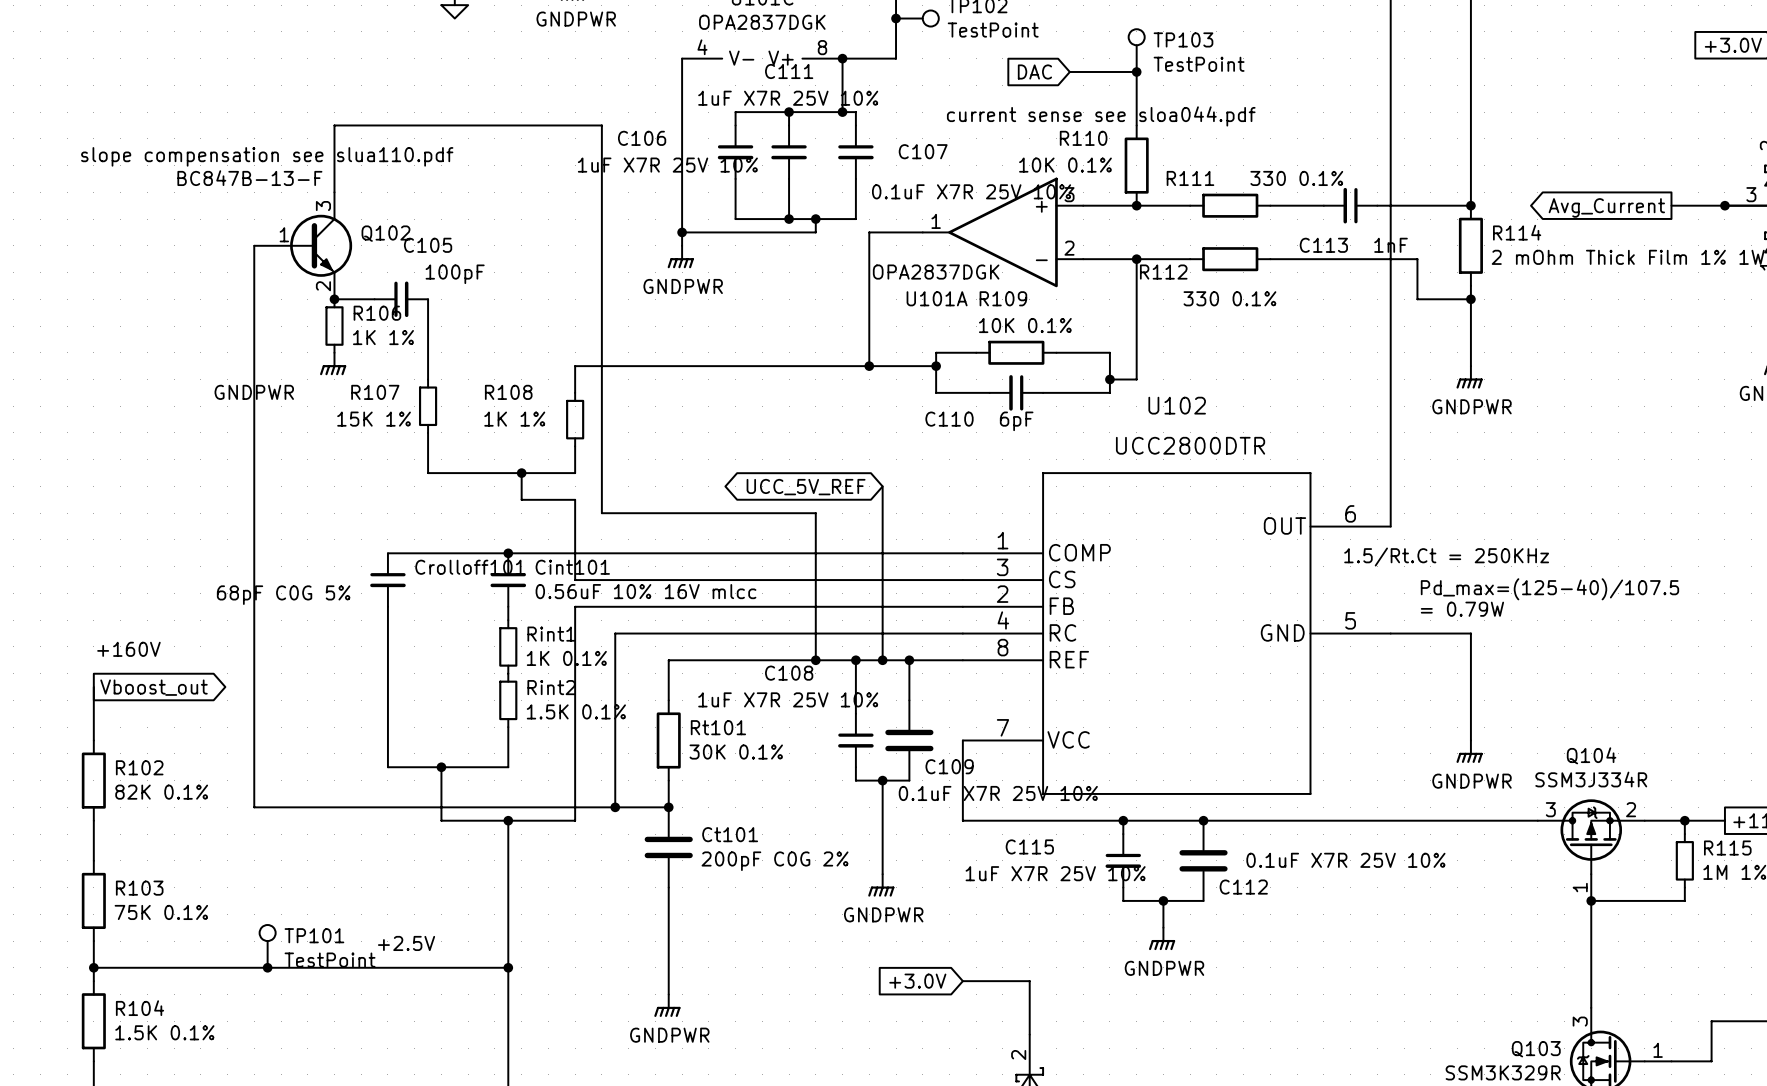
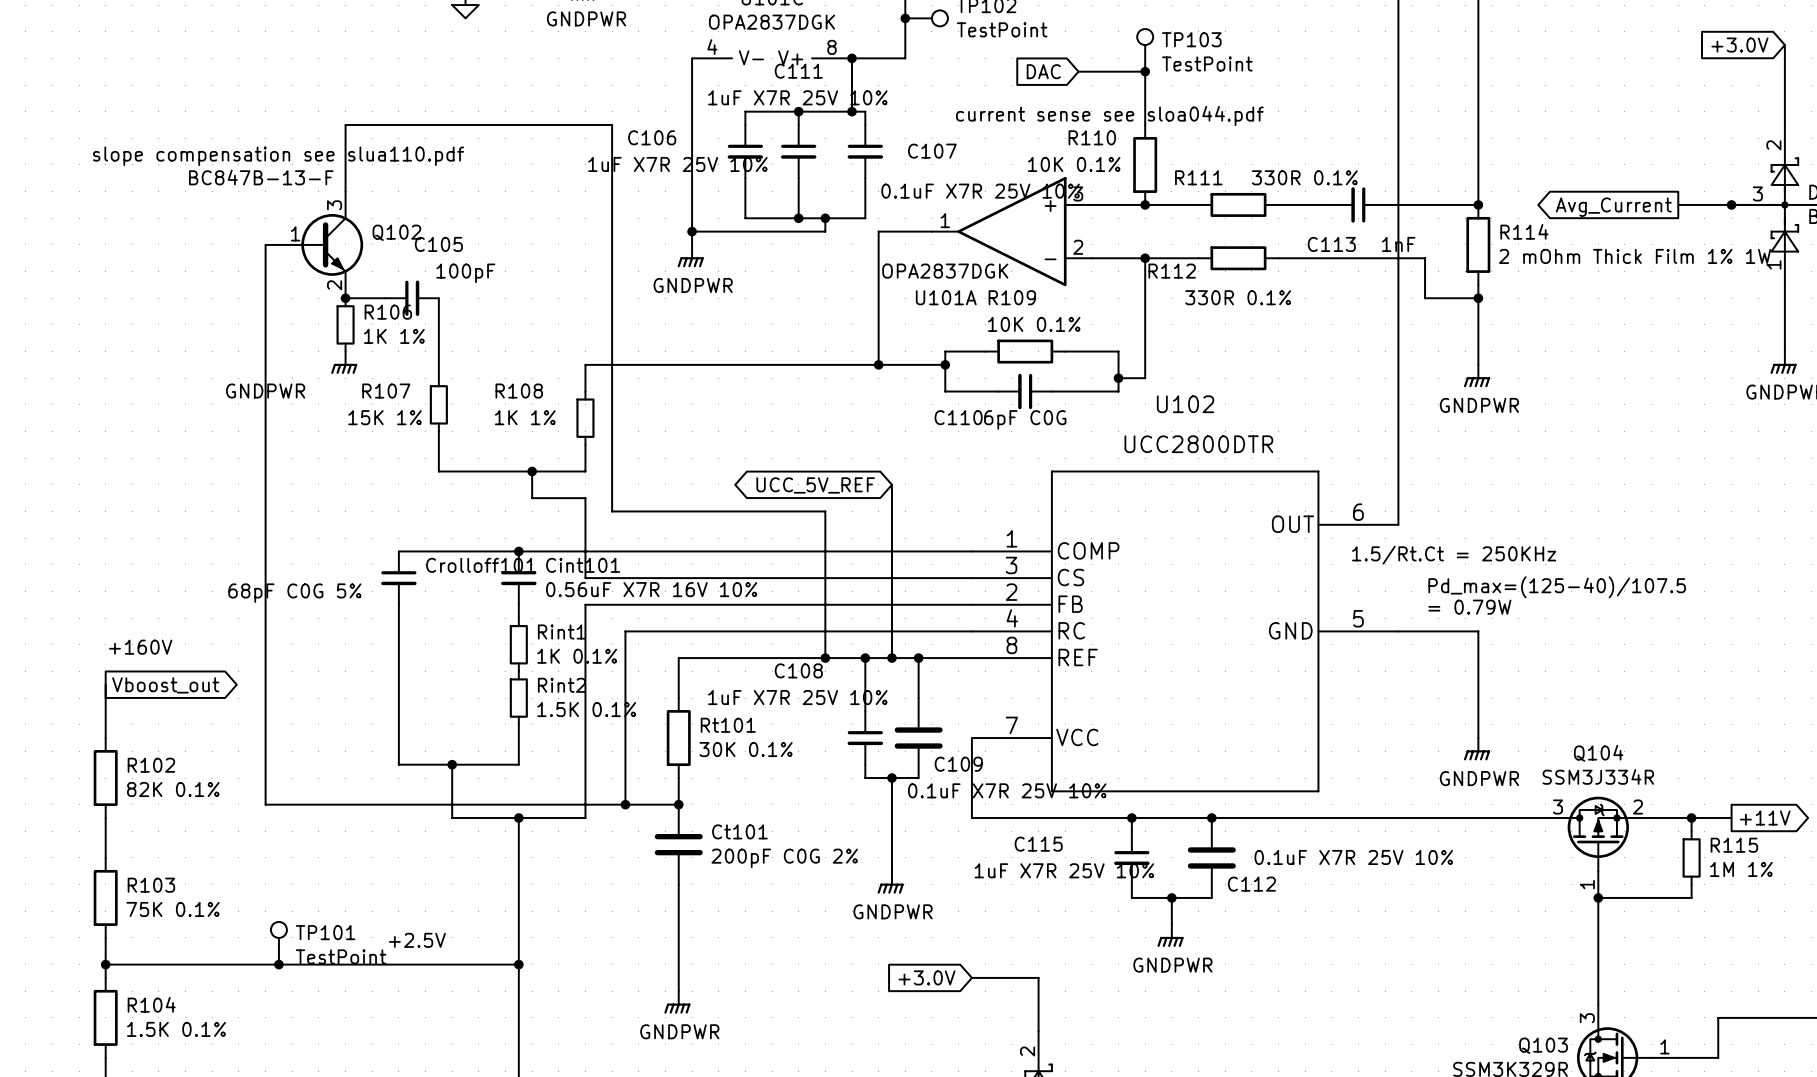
R111 value: 330 0.1% (1296, 178) -> 330R 0.1% (1304, 177)
R112 value: 330 0.1% (1229, 298) -> 330R 0.1% (1238, 297)
C110 value: 6pF (1016, 421) -> 6pF C0G (1025, 419)
Cint101 value: 0.56uF 10% 16V mlcc (646, 591) -> 0.56uF X7R 16V 10% (651, 589)

